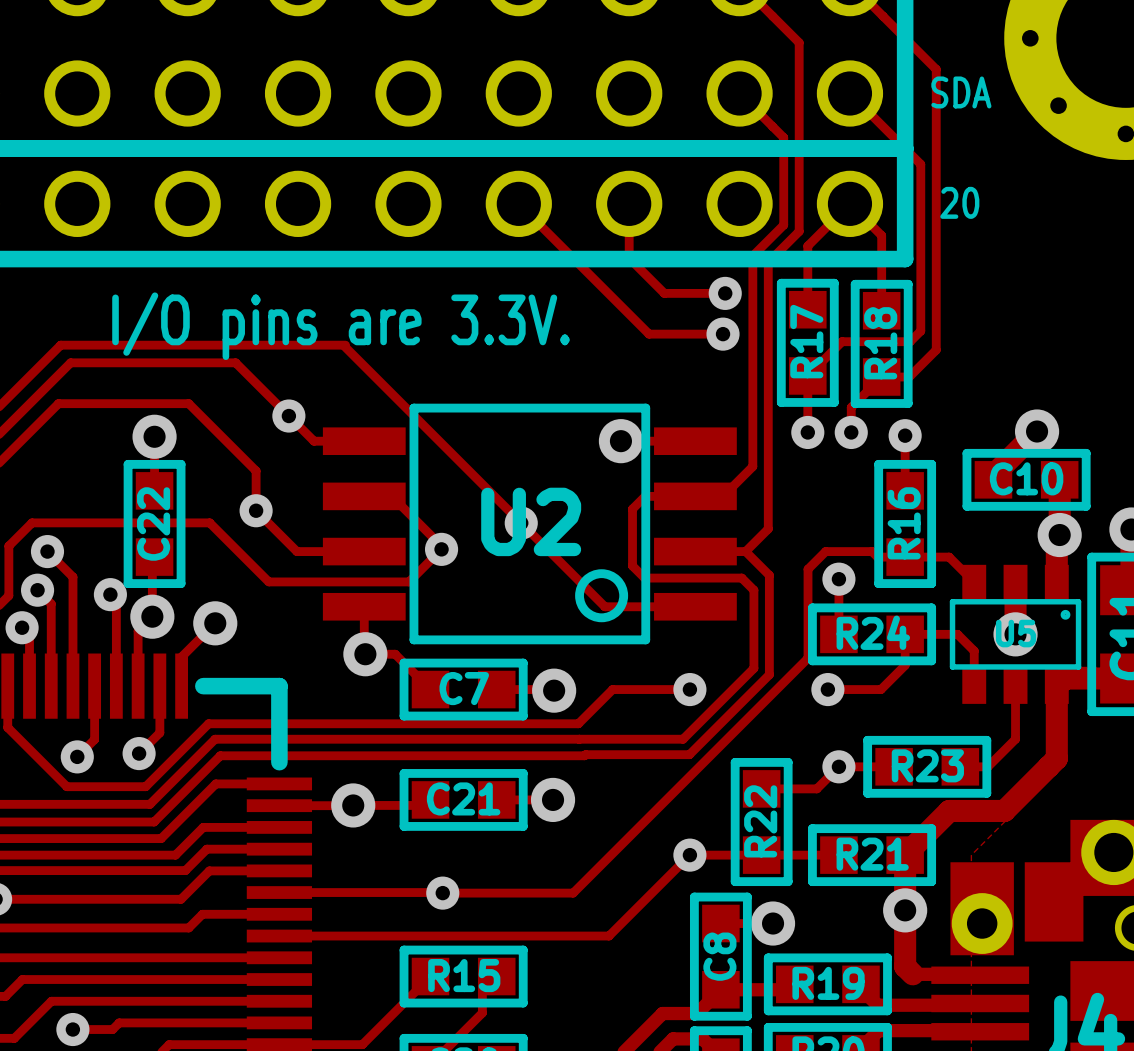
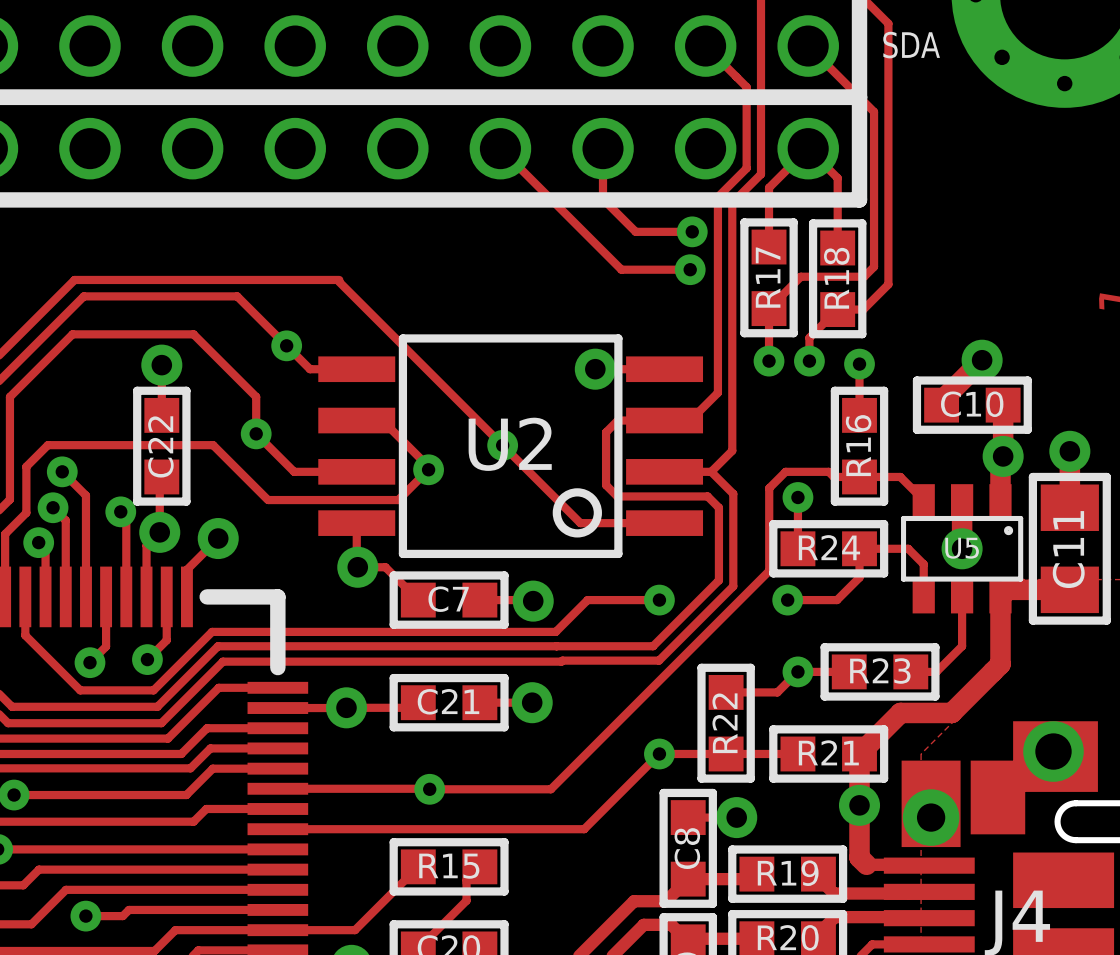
text: 20 (959, 202) -> none
text: I/O pins are 3.3V. (341, 326) -> none

